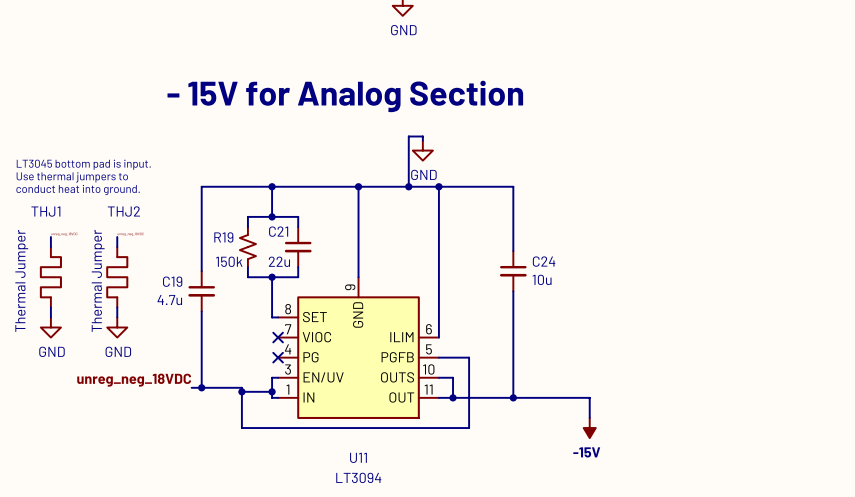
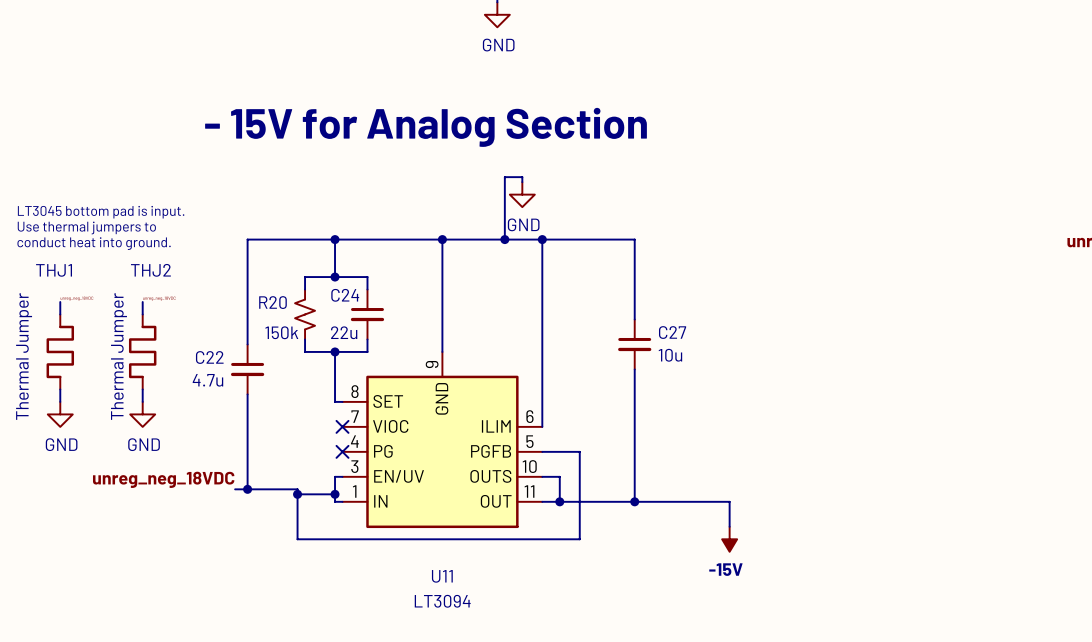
C21 name: C21 (278, 231) -> C24 (345, 295)
R19 name: R19 (223, 237) -> R20 (272, 302)
C24 name: C24 (544, 261) -> C27 (672, 332)
C19 name: C19 (172, 281) -> C22 (209, 357)

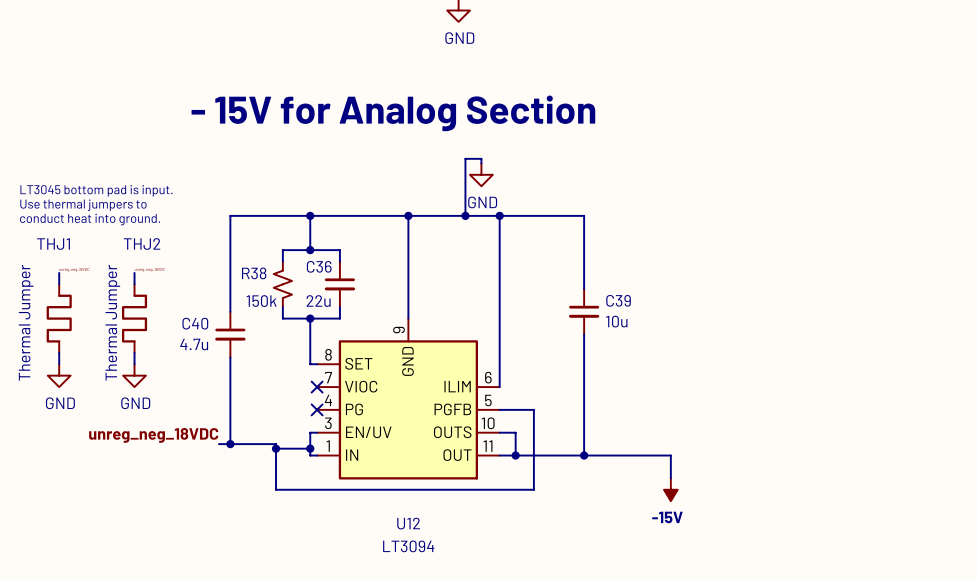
C24 name: C24 (345, 295) -> C36 (319, 266)
R20 name: R20 (272, 302) -> R38 (254, 273)
C27 name: C27 (672, 332) -> C39 (618, 300)
C22 name: C22 (209, 357) -> C40 (195, 323)
U11 name: U11 (442, 576) -> U12 (408, 523)

